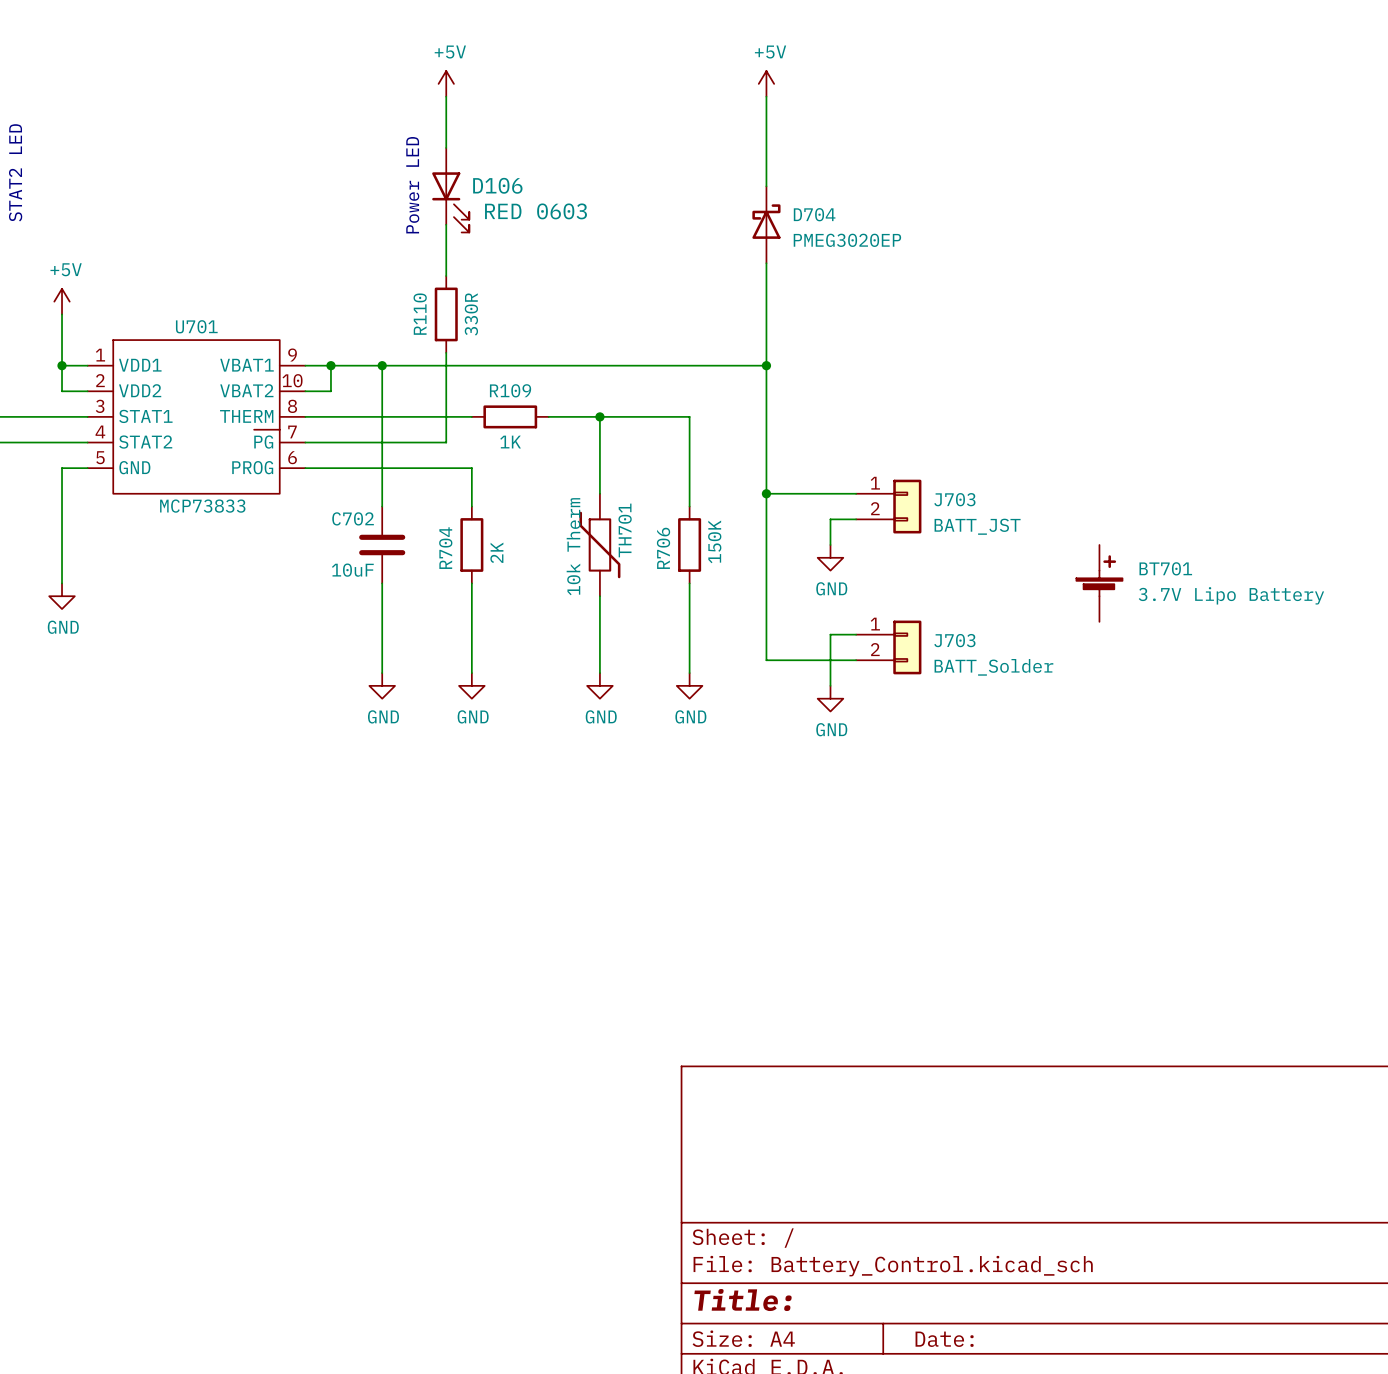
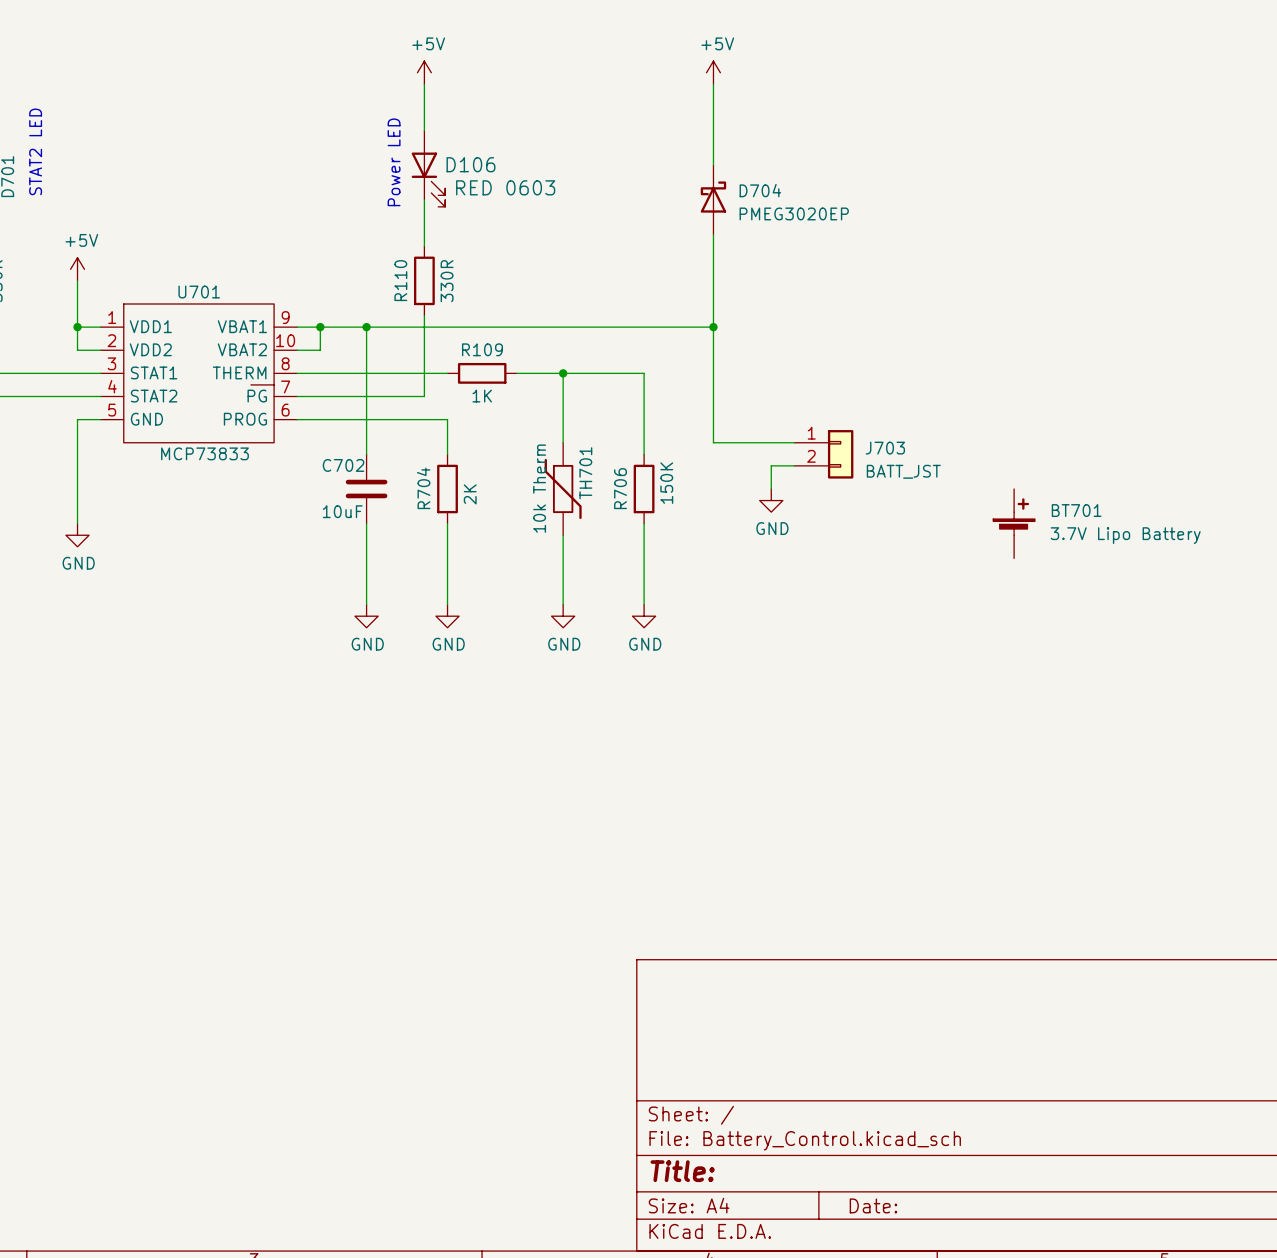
wire: (766, 493) (766, 660) (856, 660) -> none
junction: (766, 493) -> none
wire: (856, 634) (830, 634) (830, 685) -> none
J703: BATT_Solder (888, 647) -> none
power symbol: GND (830, 698) -> none

